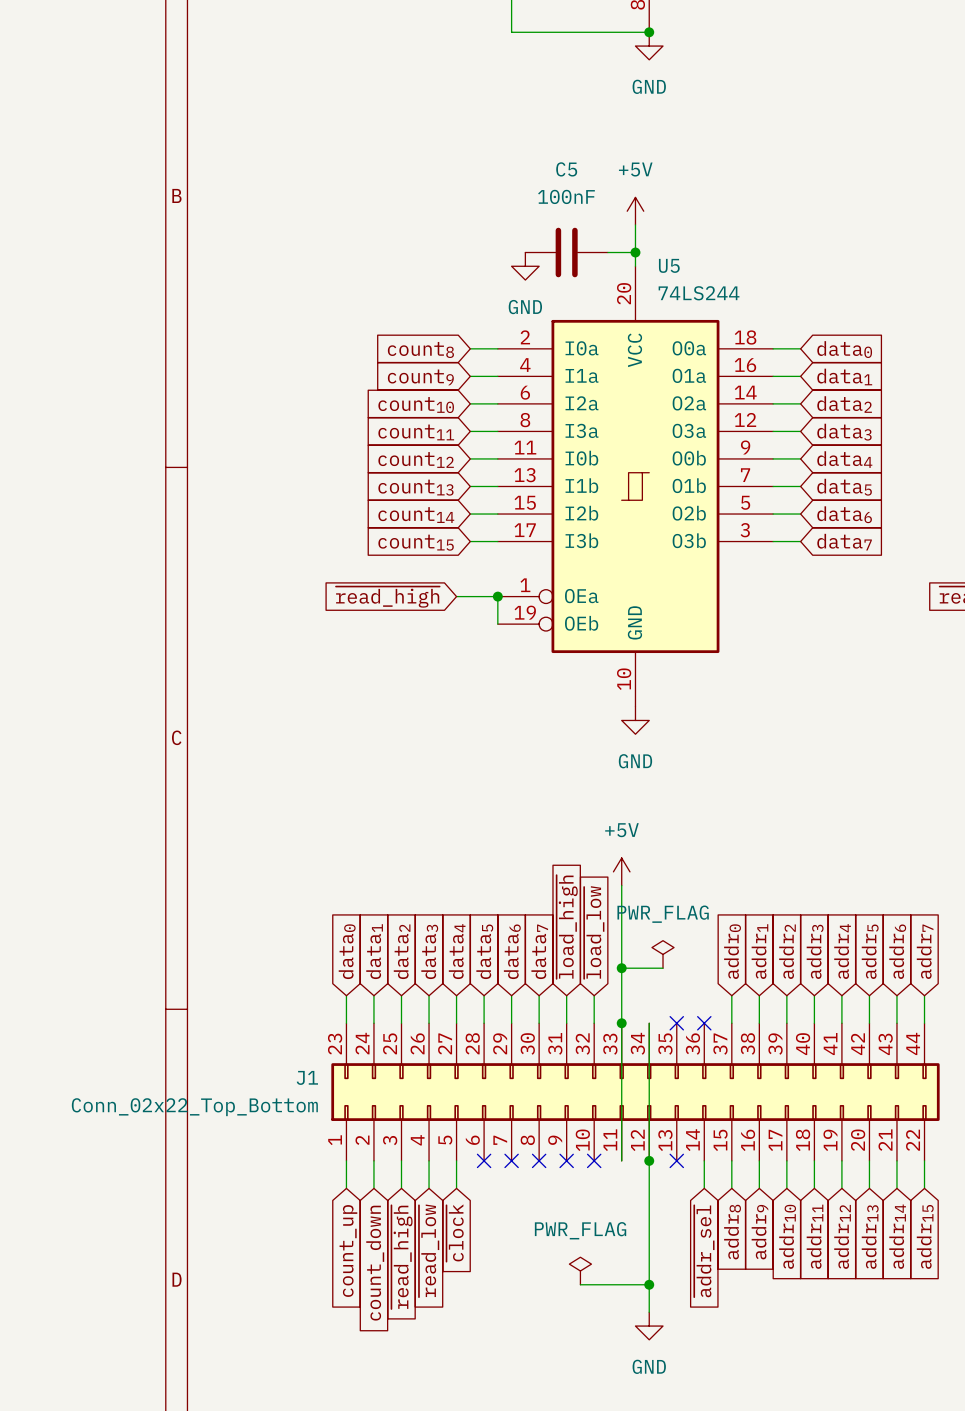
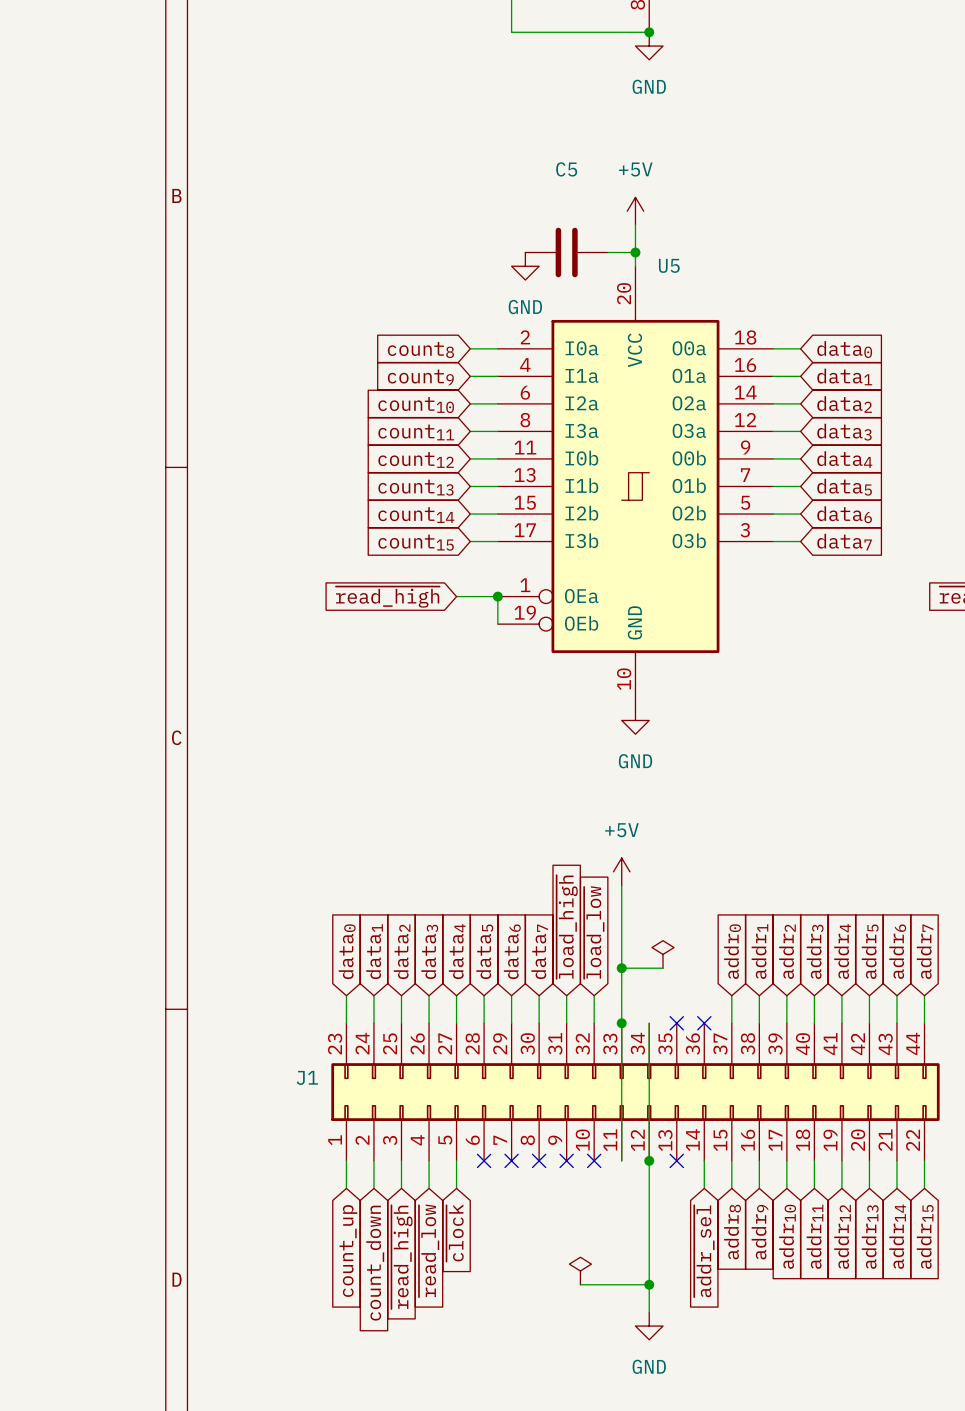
C5 value: 100nF (566, 196) -> none
U5 value: 74LS244 (699, 293) -> none
power symbol text: PWR_FLAG (663, 914) -> none
J1 value: Conn_02x22_Top_Bottom (194, 1107) -> none
power symbol text: PWR_FLAG (580, 1230) -> none

